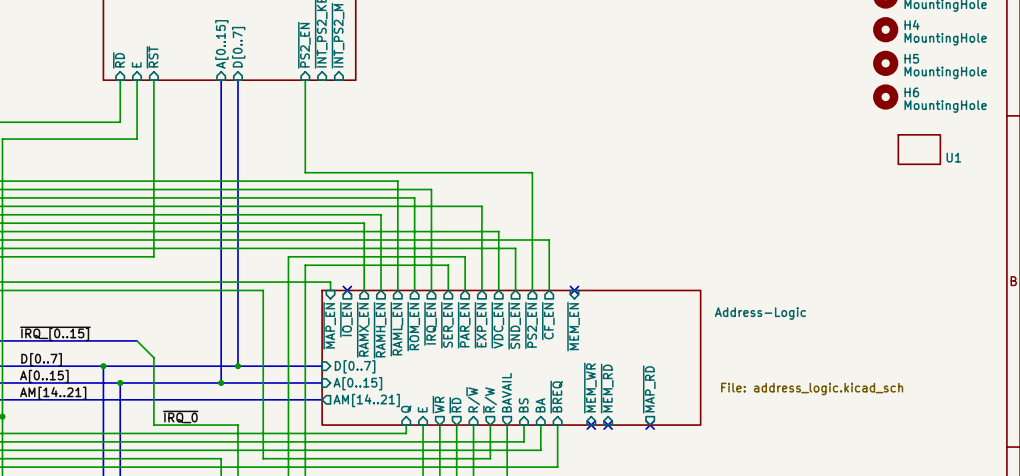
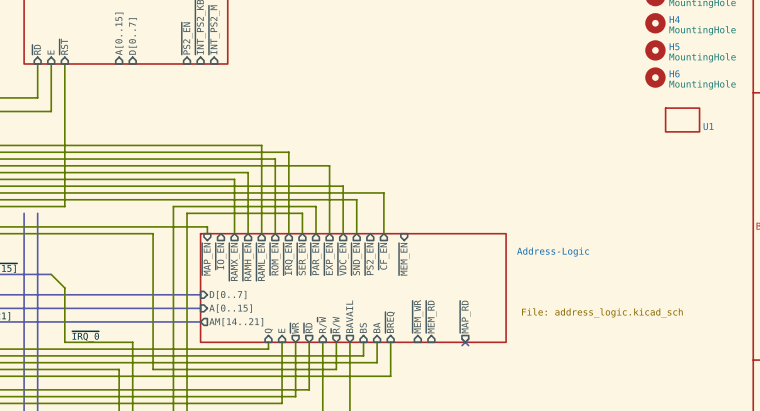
bus: (221, 80) (221, 382) -> none
bus: (238, 80) (238, 366) -> none
wire: (305, 80) (305, 172) (532, 172) (532, 290) -> none
bus: none -> (24, 213) (24, 294)
bus: none -> (37, 213) (37, 308)
no-connect mark: (347, 290) -> none
no-connect mark: (574, 290) -> none
junction: (103, 366) -> none
junction: (238, 366) -> none
junction: (120, 382) -> none
junction: (221, 382) -> none
no-connect mark: (591, 425) -> none
no-connect mark: (608, 425) -> none

